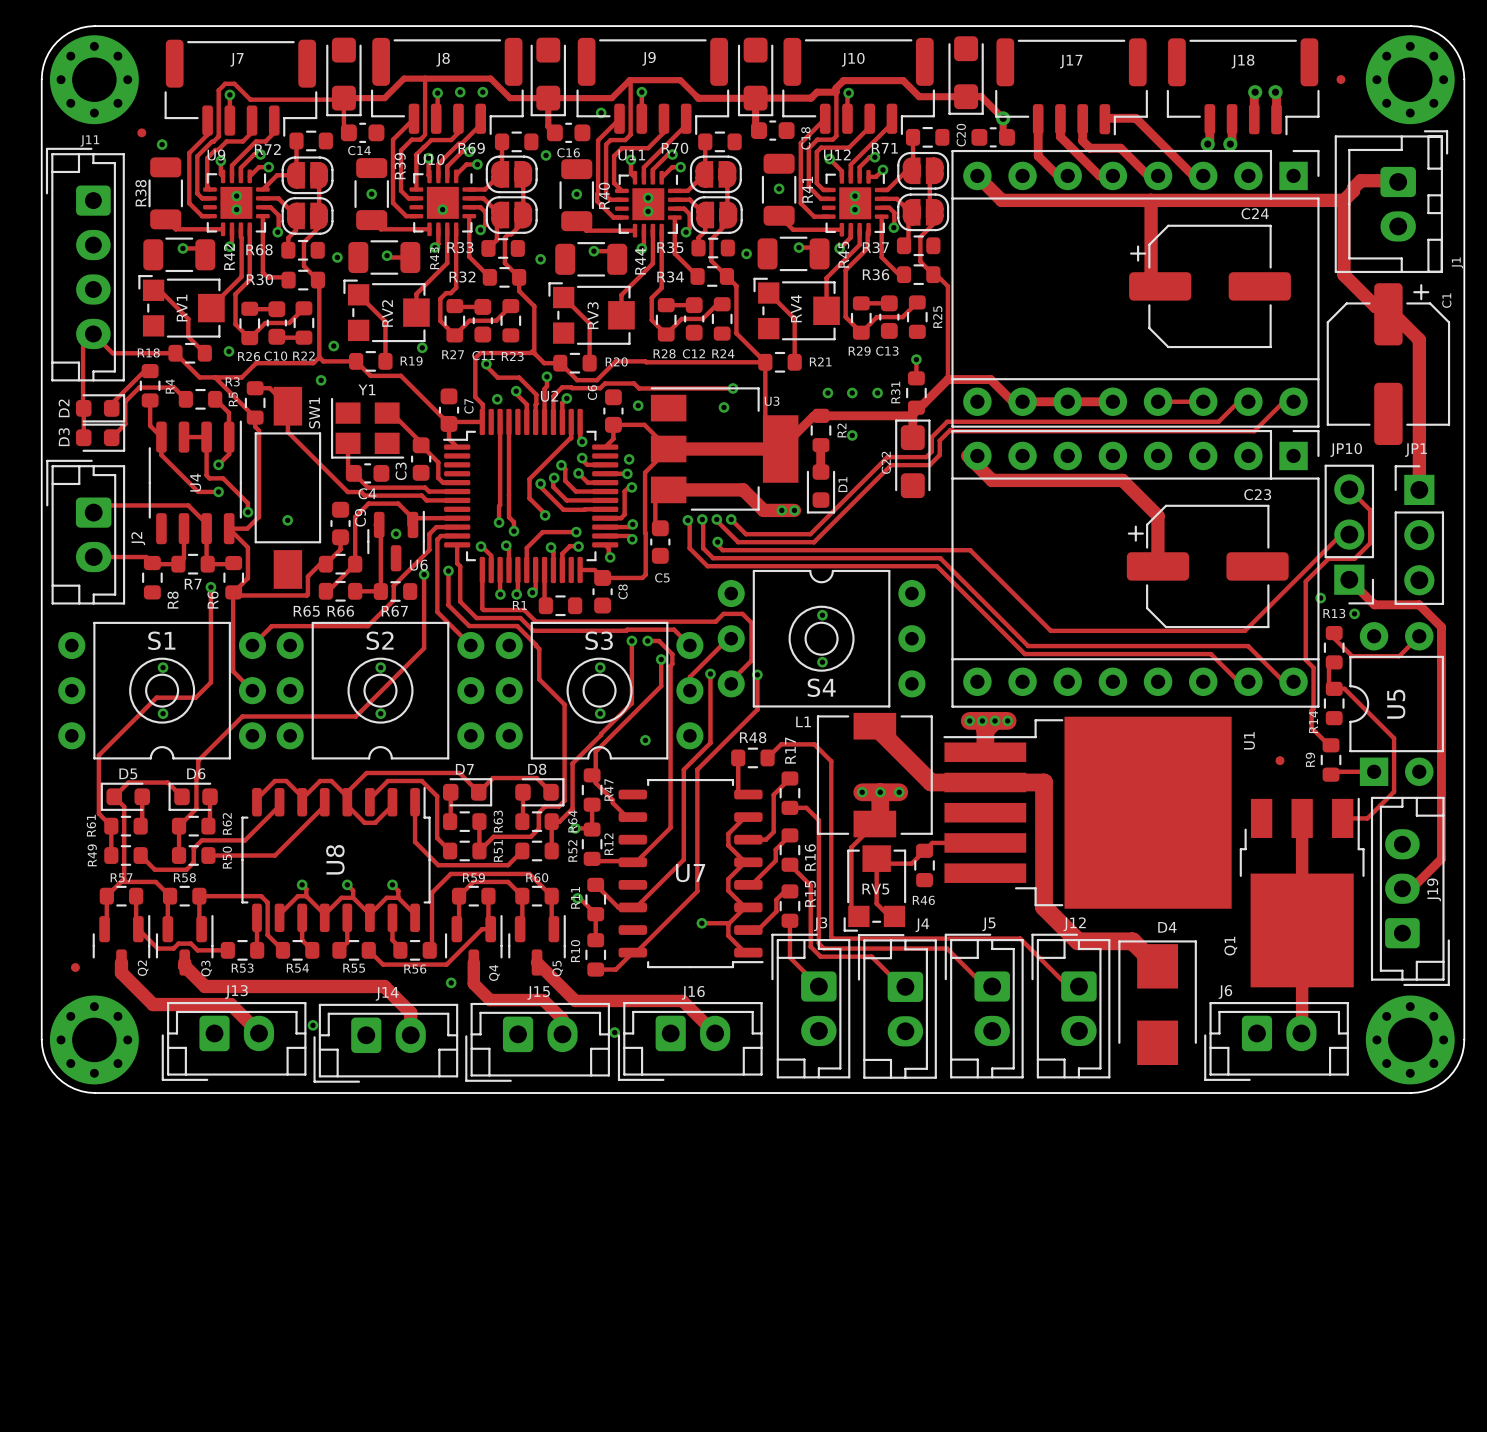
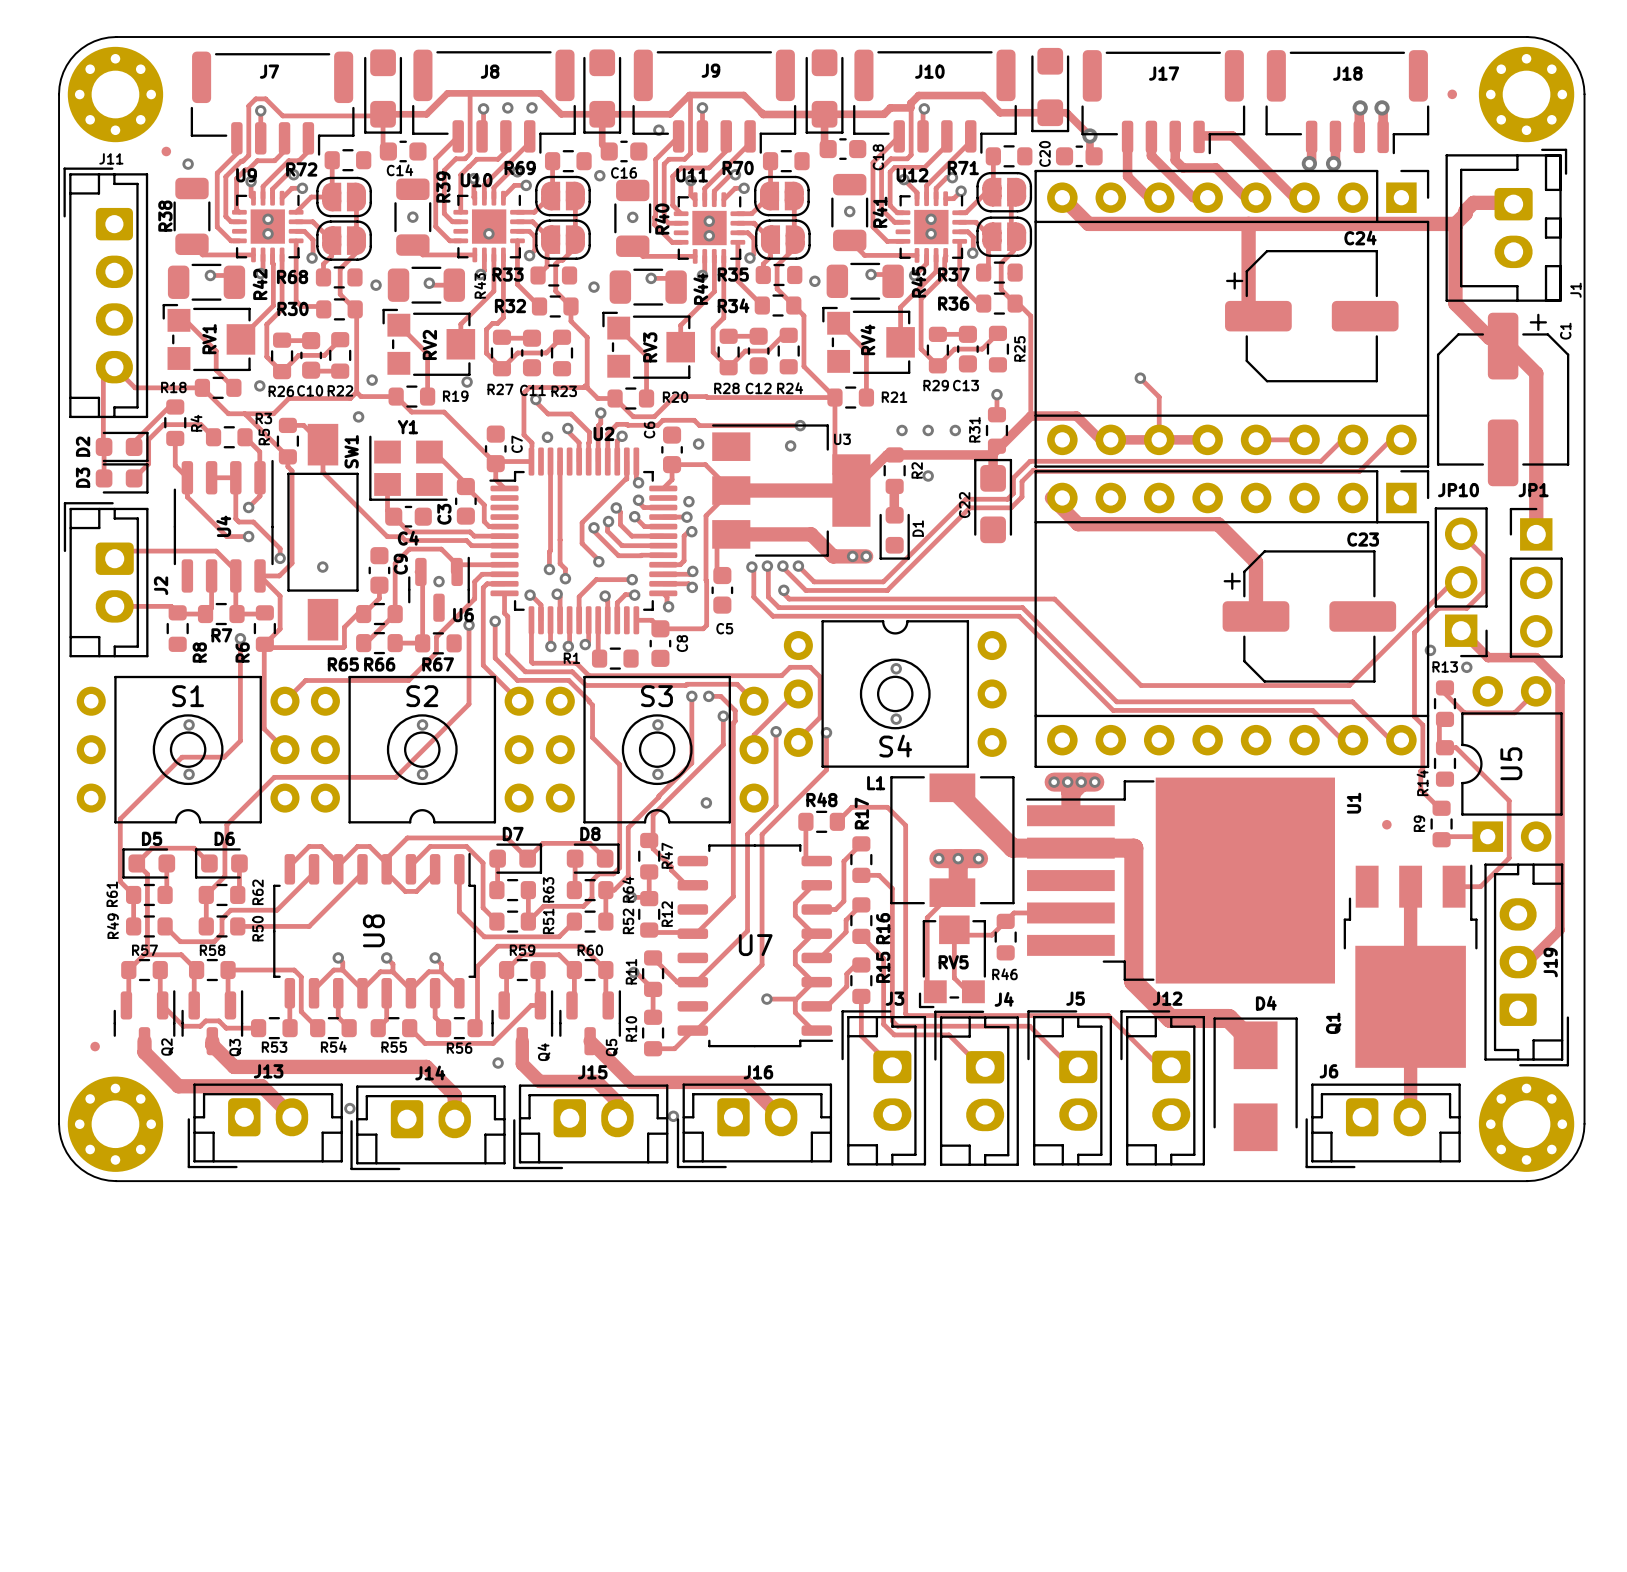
track: none -> (1140, 378) (1159, 397) (1159, 439)
via: none -> (1140, 378)

